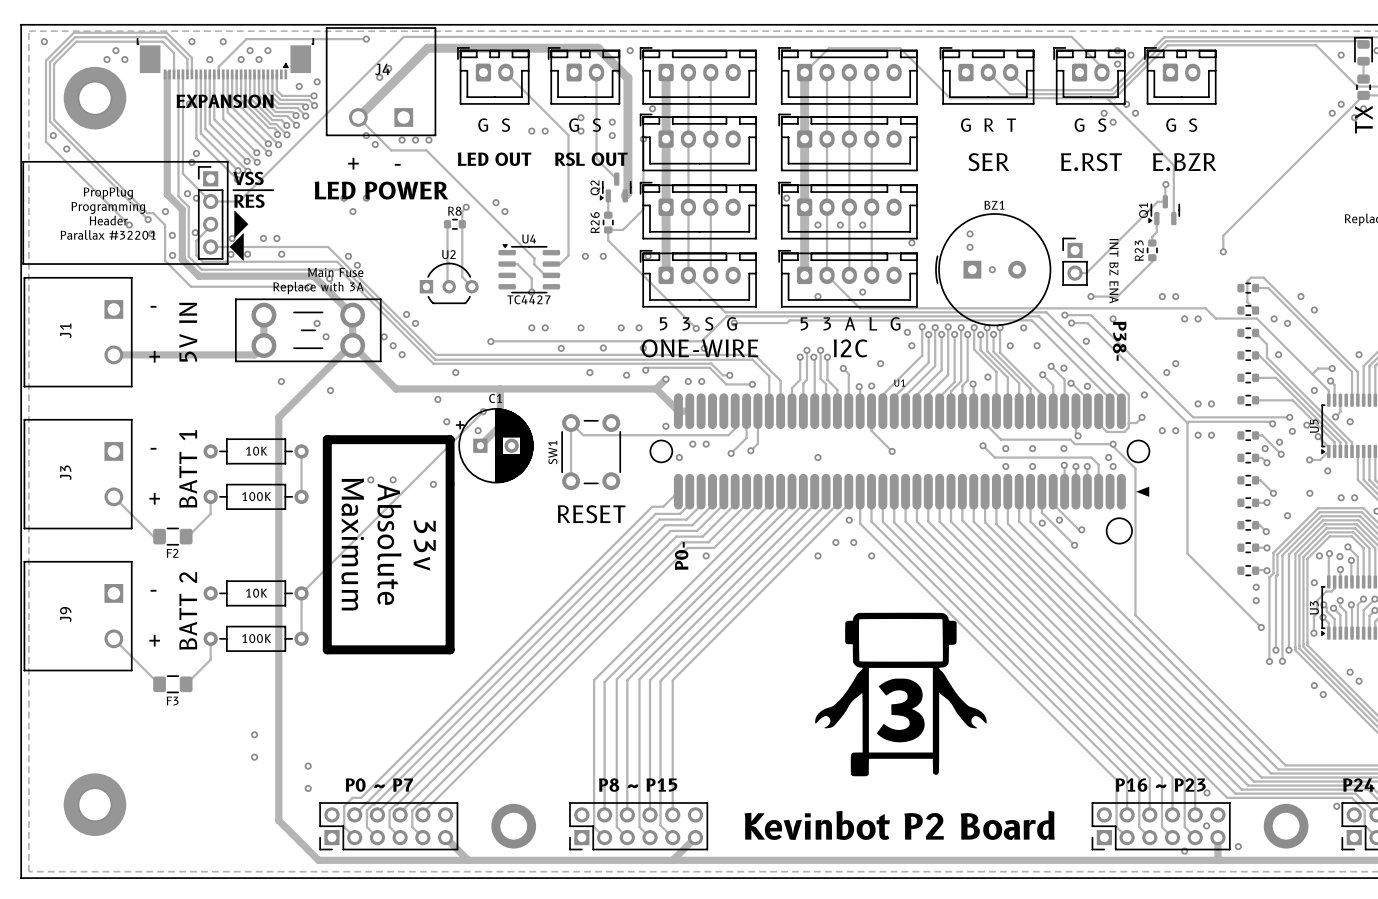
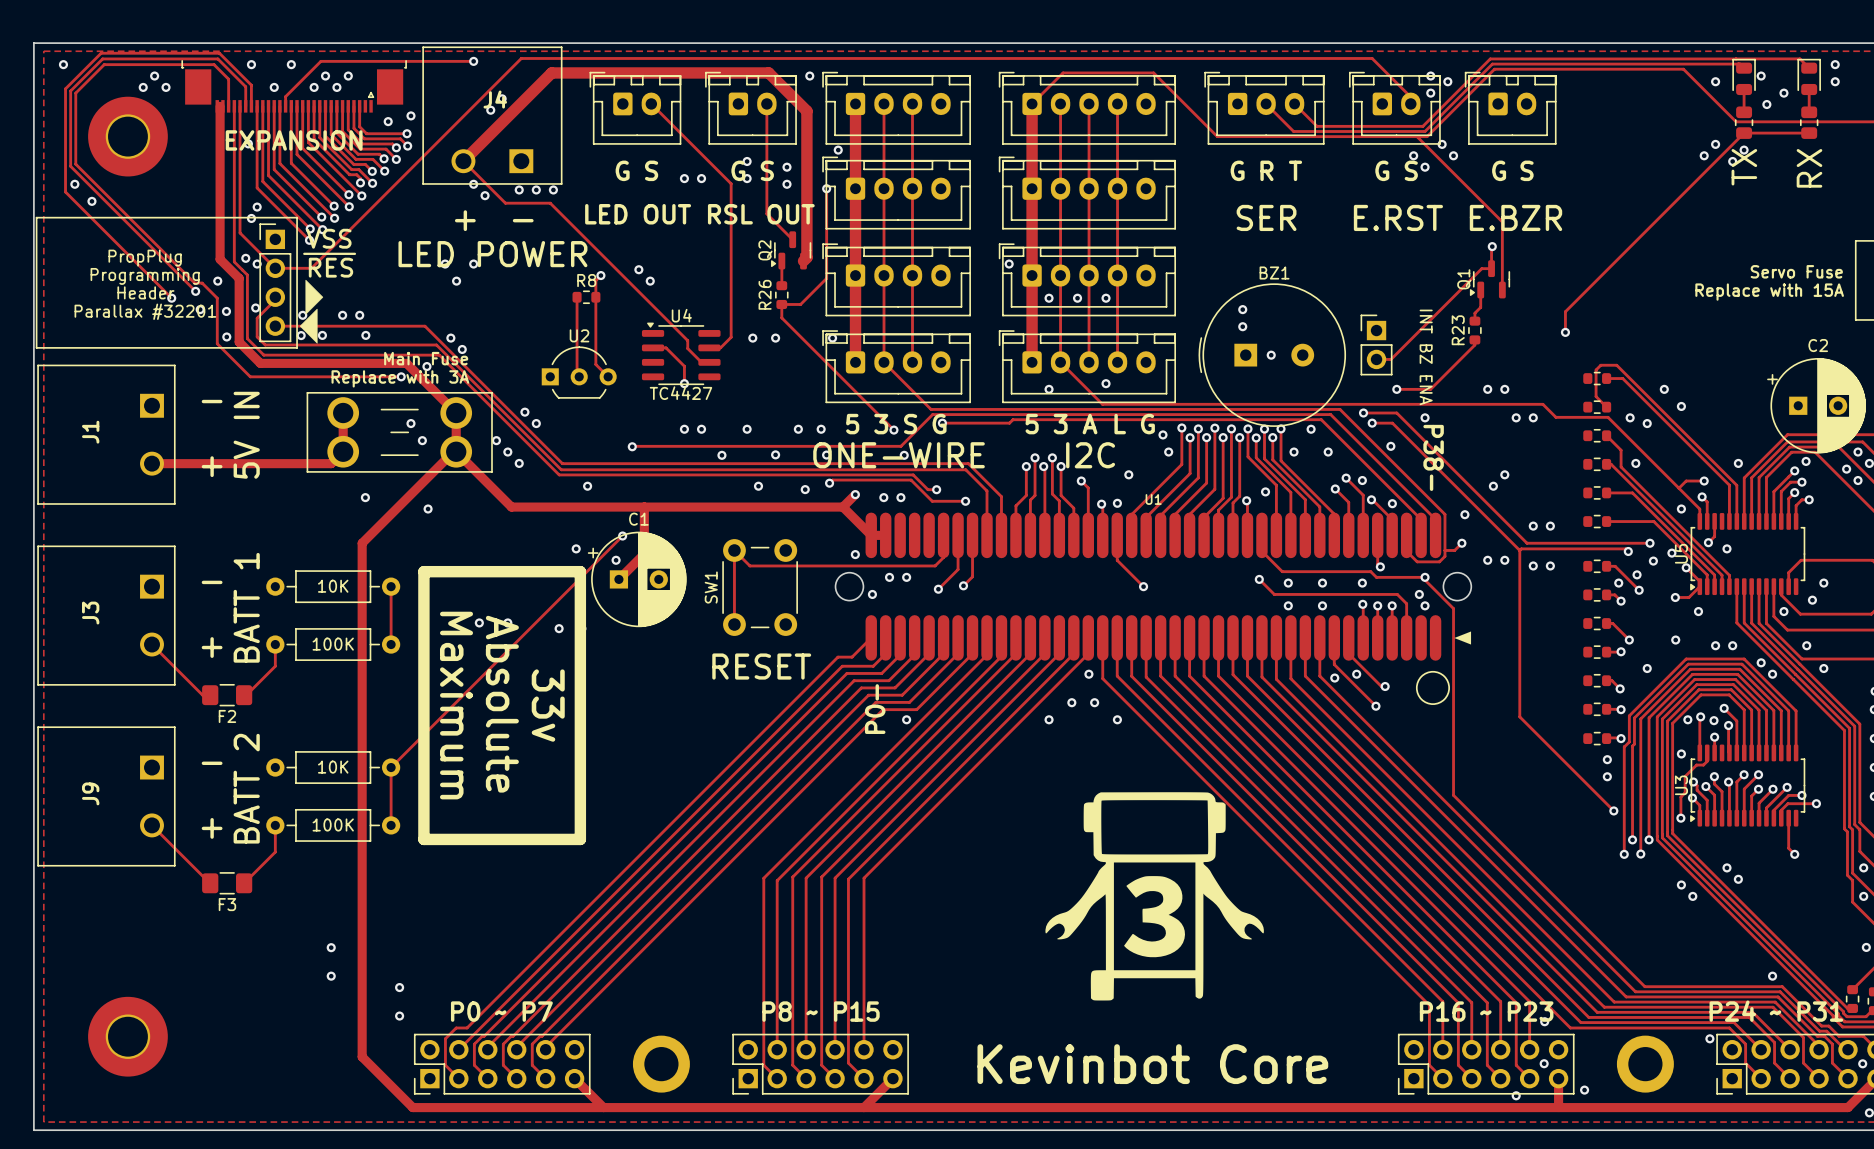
via: (911, 242) -> none
via: (437, 399) -> none
via: (817, 457) -> none
text: Kevinbot P2 Board (899, 825) -> Kevinbot Core (1152, 1064)

